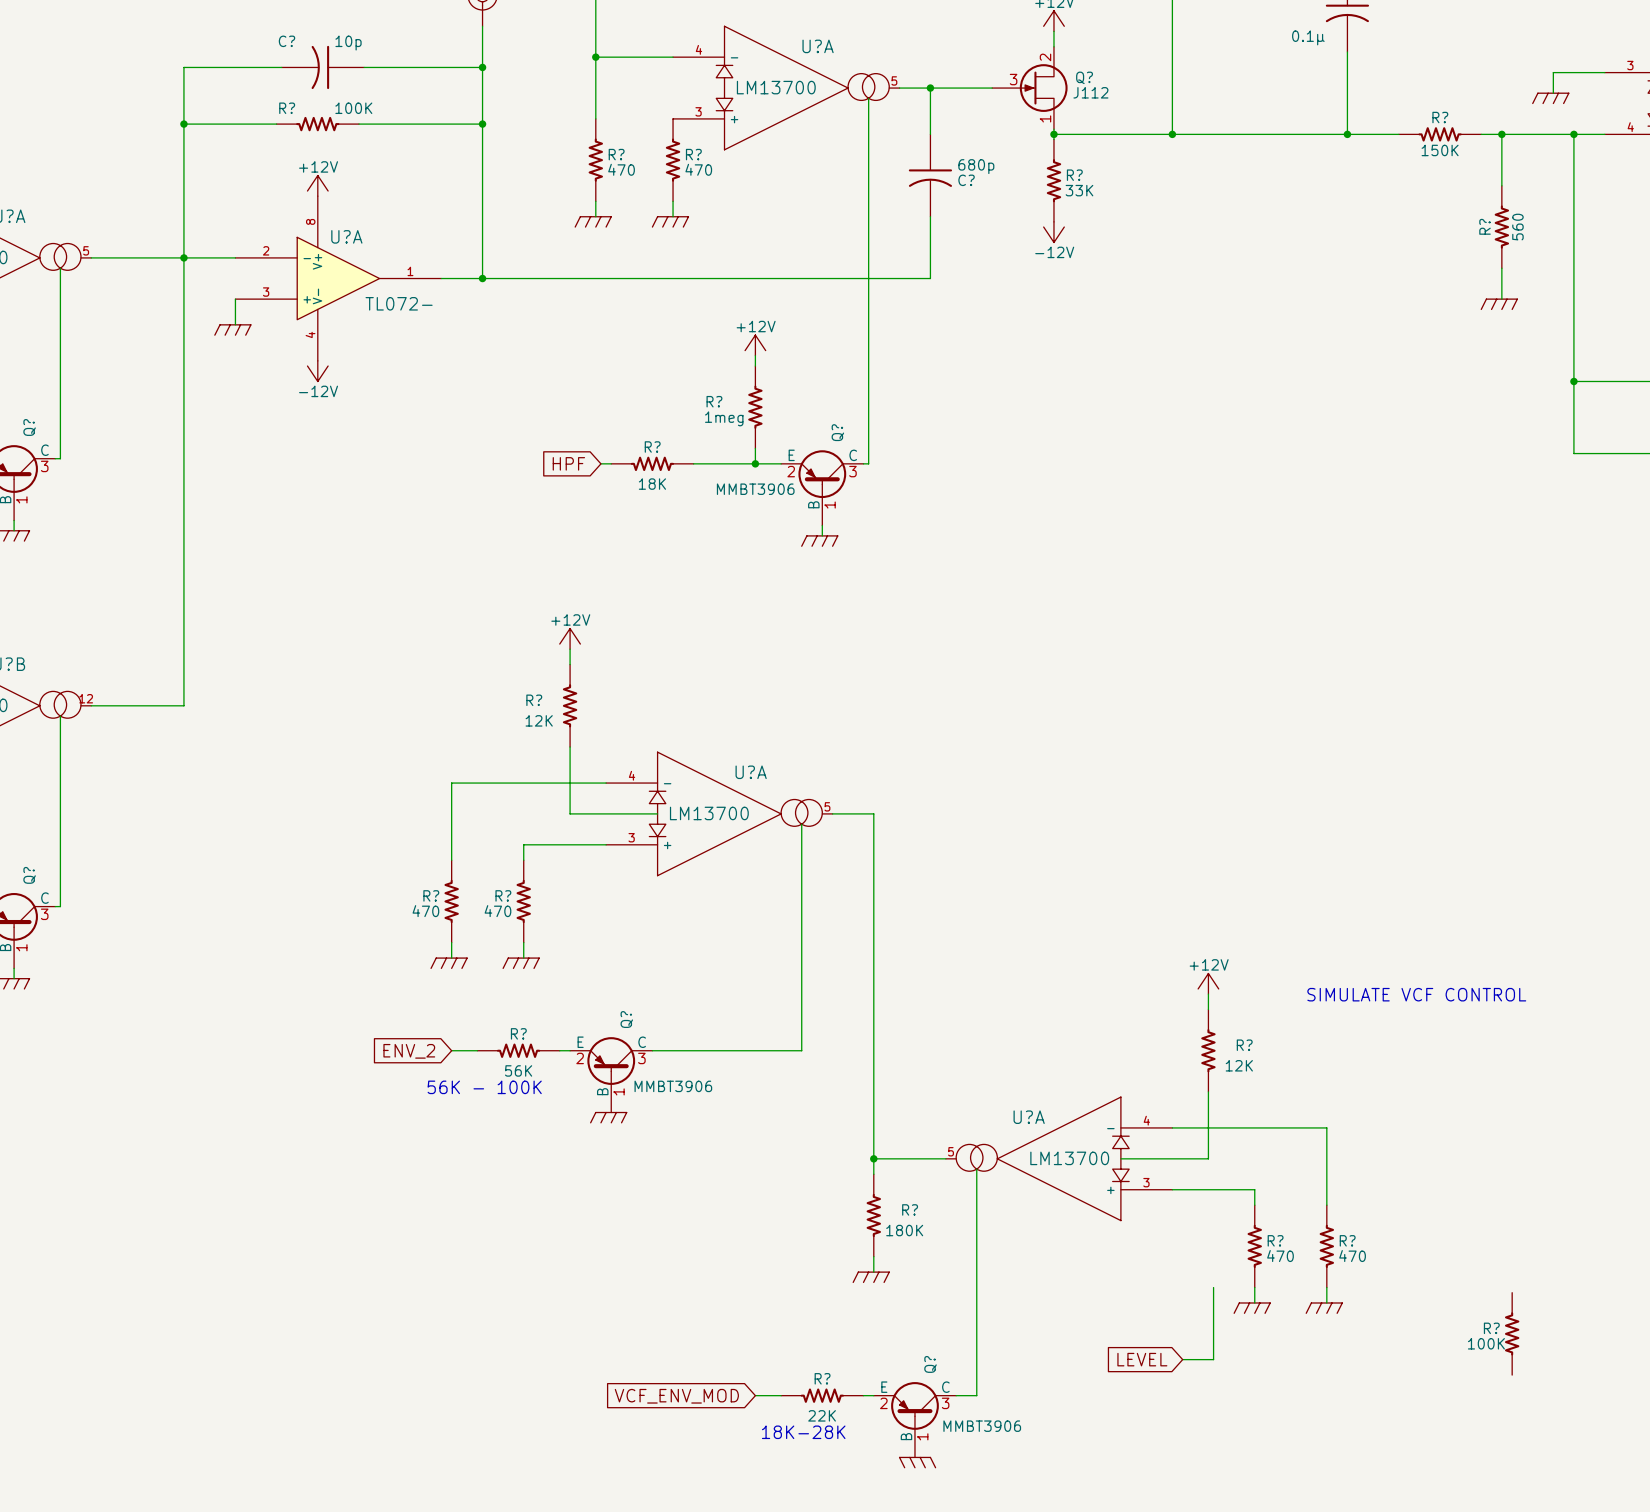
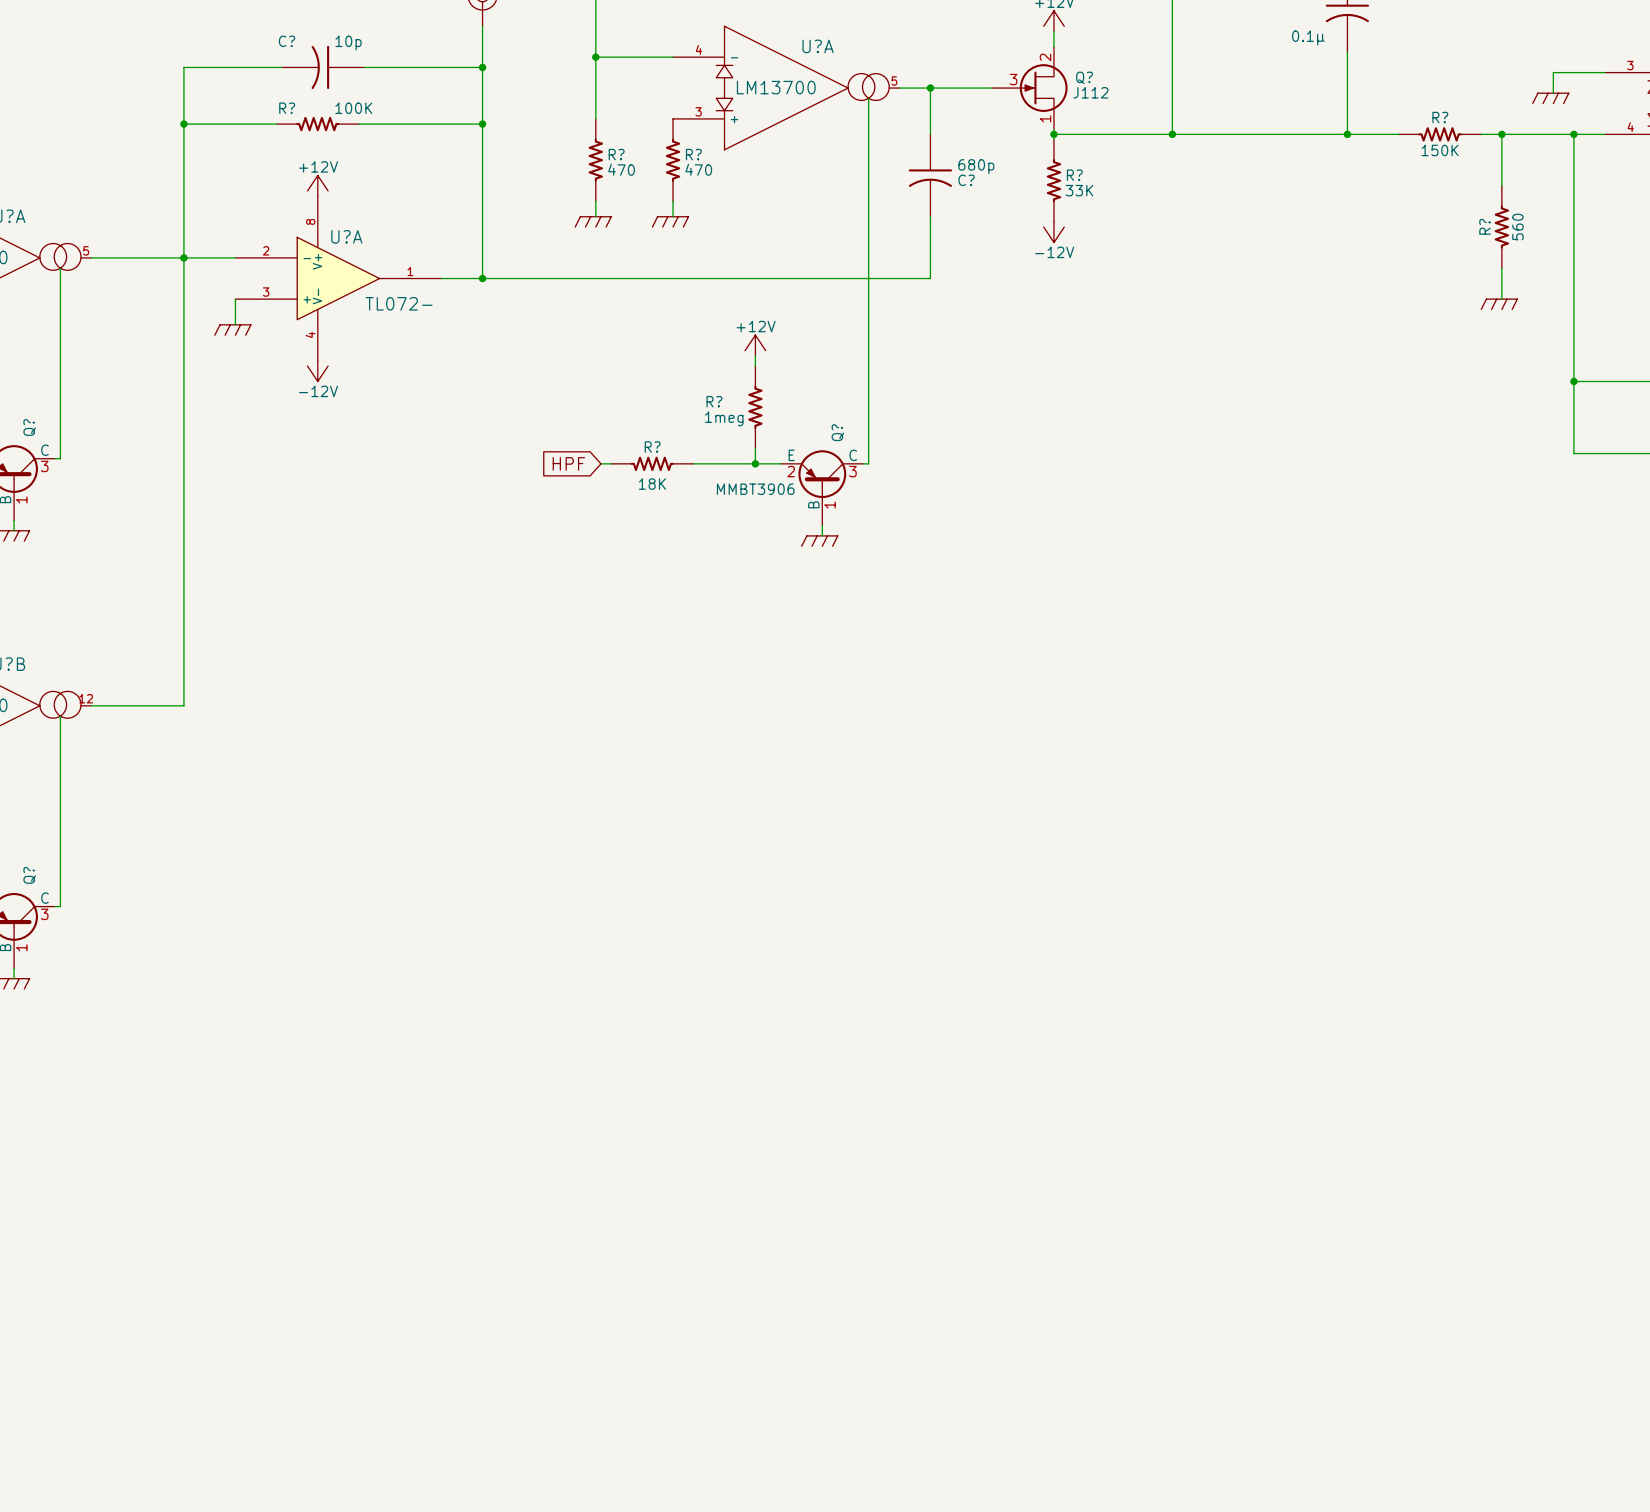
power symbol: +12V (570, 638) -> none
wire: (570, 649) (570, 664) -> none
R?: 12K (570, 705) -> none
wire: (570, 747) (570, 813) (657, 813) -> none
wire: (606, 783) (451, 783) (451, 860) -> none
U?A: LM13700 (719, 813) -> none
wire: (832, 813) (873, 813) (873, 1174) -> none
wire: (801, 824) (801, 1050) (652, 1050) -> none
wire: (606, 844) (523, 844) (523, 860) -> none
R?: 470 (451, 901) -> none
R?: 470 (523, 901) -> none
wire: (451, 942) (451, 958) -> none
wire: (523, 942) (523, 958) -> none
power symbol: (449, 963) -> none
power symbol: (521, 963) -> none
power symbol: +12V (1208, 983) -> none
wire: (1208, 994) (1208, 1009) -> none
text: SIMULATE VCF CONTROL (1416, 994) -> none
wire: (451, 1050) (477, 1050) -> none
R?: 56K (518, 1050) -> none
wire: (559, 1050) (570, 1050) -> none
R?: 12K (1208, 1050) -> none
global label: ENV_2 (409, 1051) -> none
Q?: MMBT3906 (611, 1074) -> none
text: 56K - 100K (484, 1087) -> none
wire: (1208, 1091) (1208, 1158) (1120, 1158) -> none
power symbol: (608, 1117) -> none
wire: (1172, 1127) (1326, 1127) (1326, 1205) -> none
wire: (873, 1158) (945, 1158) -> none
junction: (873, 1158) -> none
U?A: LM13700 (1059, 1158) -> none
wire: (976, 1169) (976, 1395) (956, 1395) -> none
wire: (1172, 1189) (1254, 1189) (1254, 1205) -> none
R?: 180K (873, 1215) -> none
R?: 470 (1254, 1246) -> none
R?: 470 (1326, 1246) -> none
wire: (873, 1256) (873, 1272) -> none
power symbol: (871, 1277) -> none
wire: (1213, 1287) (1213, 1359) (1182, 1359) -> none
wire: (1254, 1287) (1254, 1302) -> none
wire: (1326, 1287) (1326, 1302) -> none
power symbol: (1252, 1308) -> none
power symbol: (1324, 1308) -> none
R?: 100K (1512, 1333) -> none
global label: LEVEL (1142, 1359) -> none
wire: (755, 1395) (781, 1395) -> none
R?: 22K (822, 1395) -> none
wire: (863, 1395) (873, 1395) -> none
global label: VCF_ENV_MOD (676, 1396) -> none
Q?: MMBT3906 (914, 1419) -> none
text: 18K-28K (803, 1432) -> none
power symbol: (917, 1462) -> none

